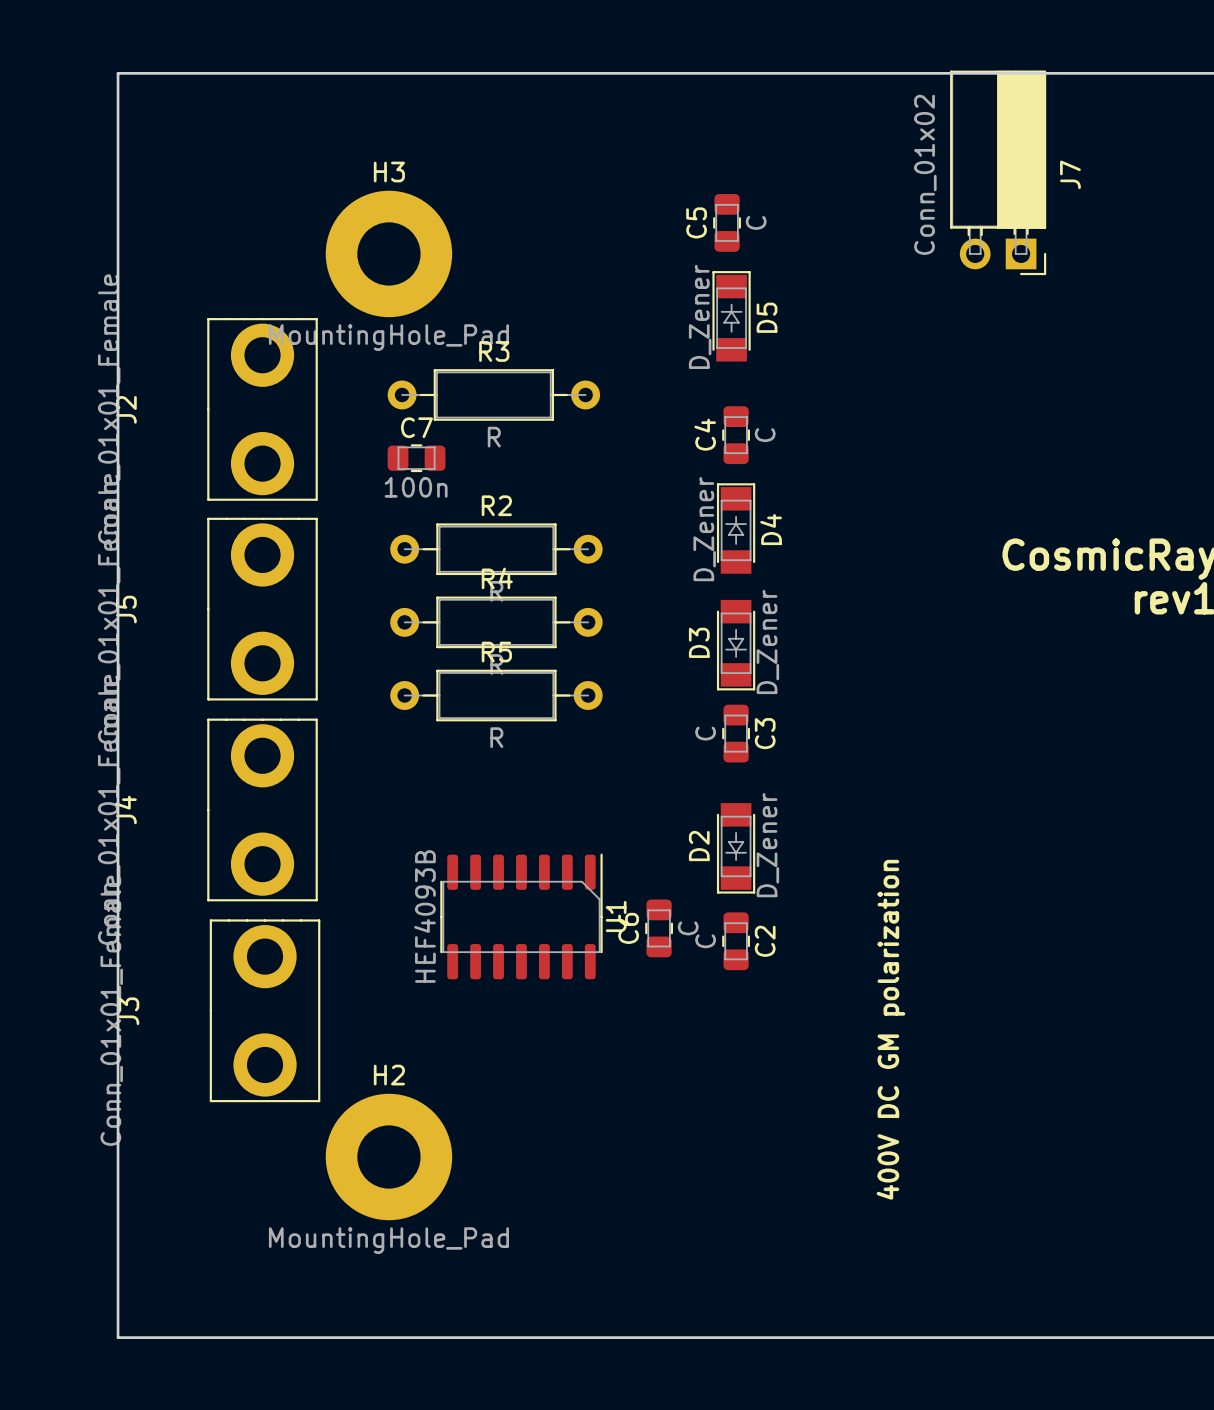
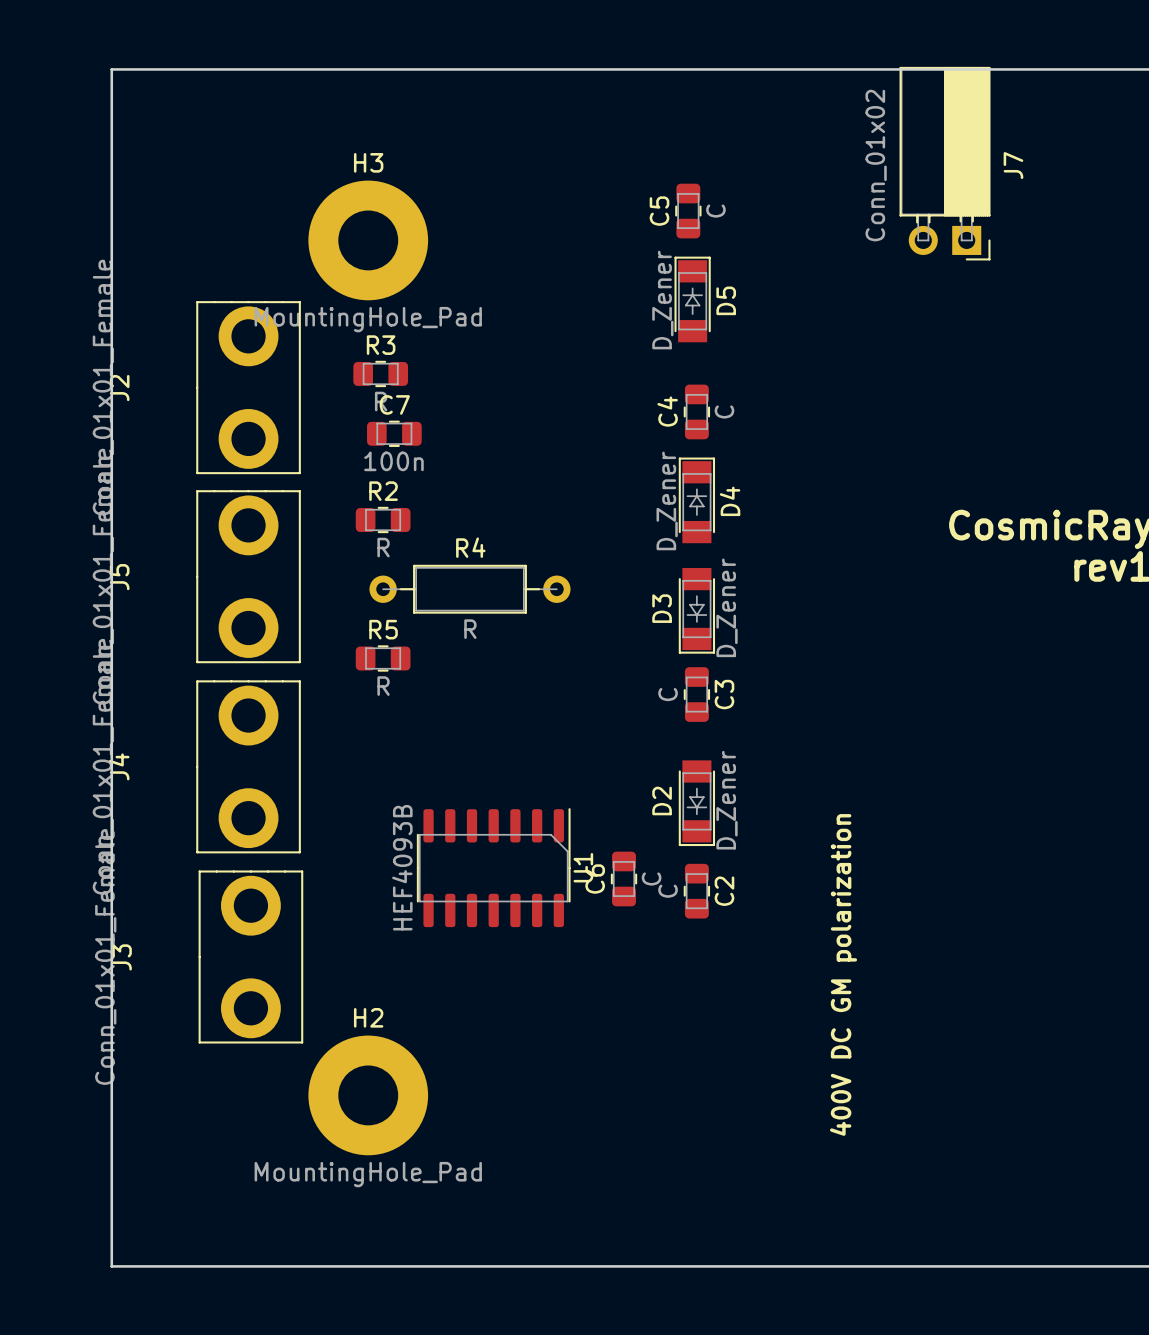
R3 footprint: [387, 369, 601, 421] -> [353, 360, 409, 388]
R2 footprint: [390, 523, 603, 576] -> [355, 506, 411, 534]
R5 footprint: [390, 669, 603, 722] -> [355, 645, 411, 672]

